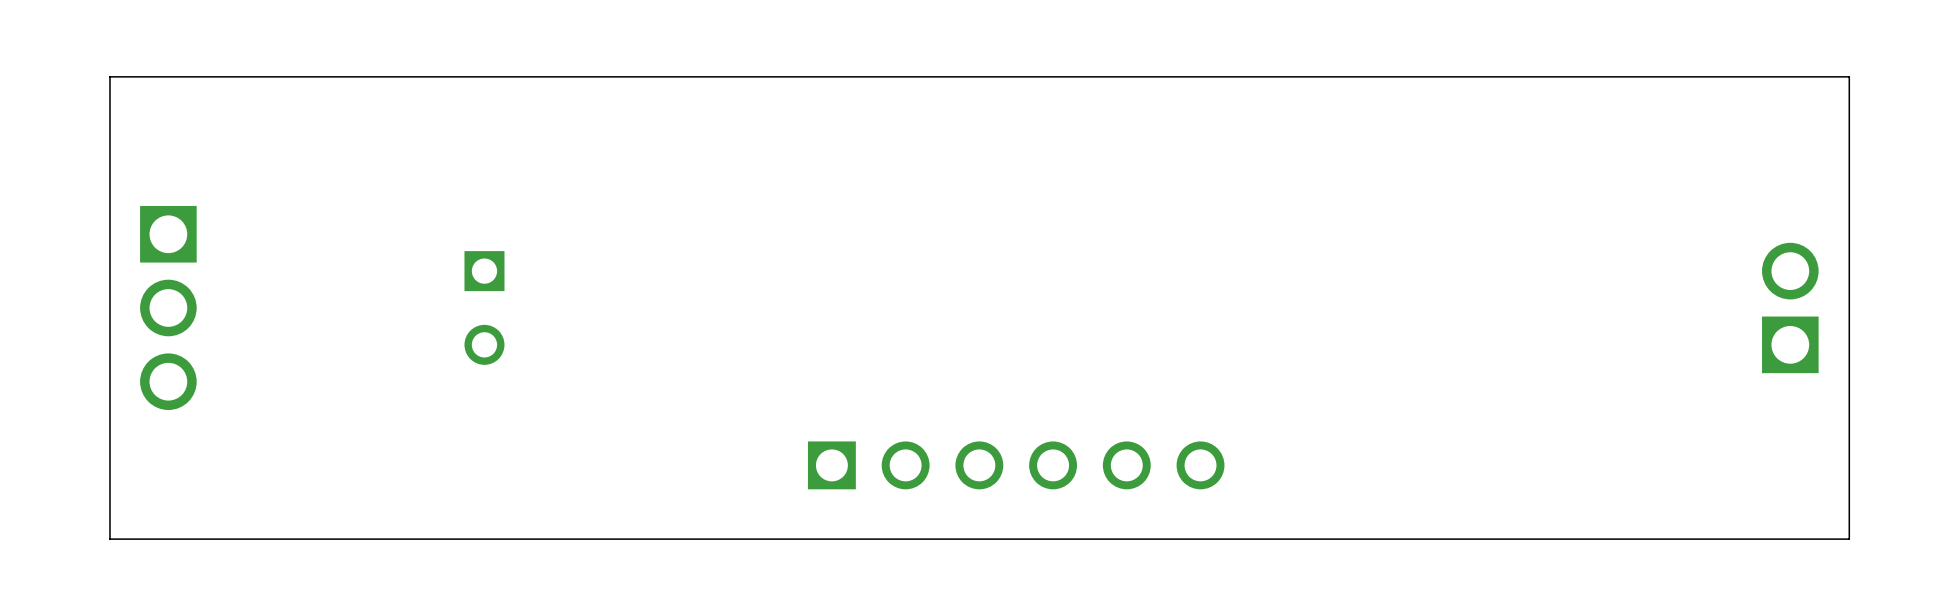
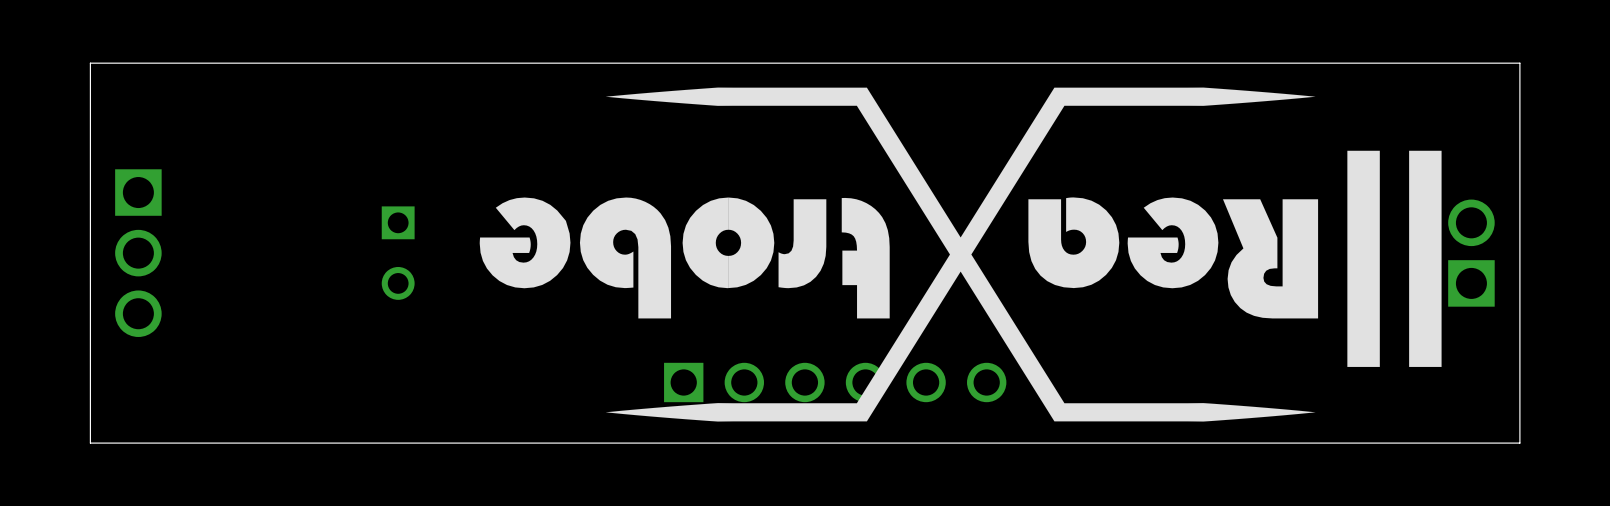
drawing: none -> [479, 87, 1319, 422]
drawing: none -> [1347, 150, 1380, 367]
drawing: none -> [1409, 150, 1442, 367]

